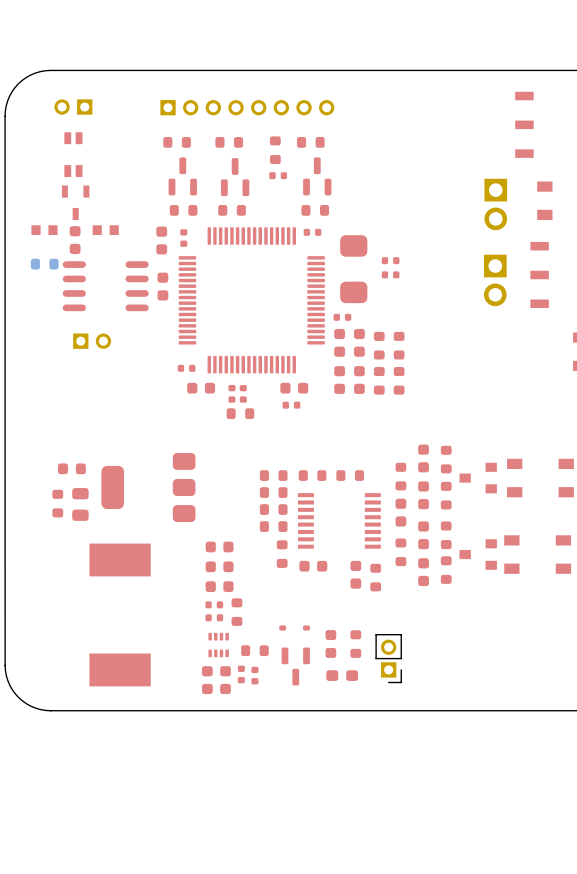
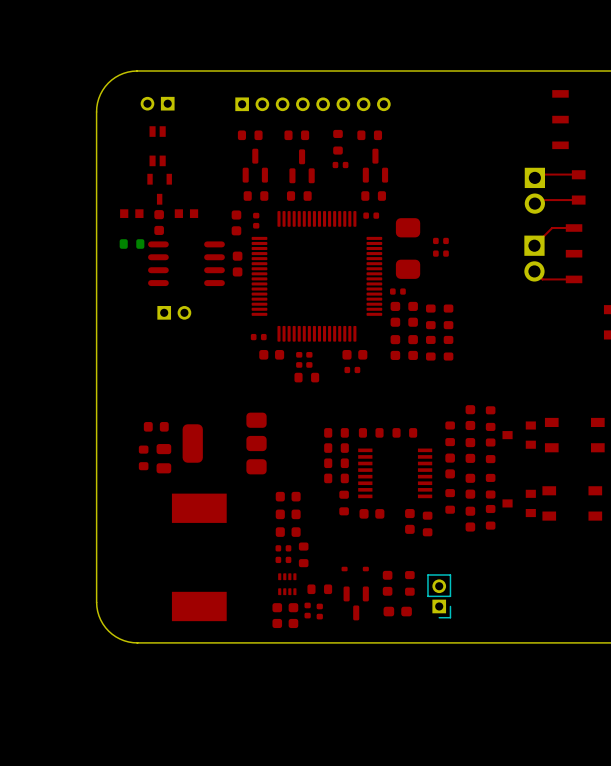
top track: none -> (535, 174) (578, 174)
top track: none -> (578, 200) (535, 200)
top track: none -> (574, 228) (552, 228) (534, 245)
top track: none -> (534, 271) (542, 279) (574, 279)

